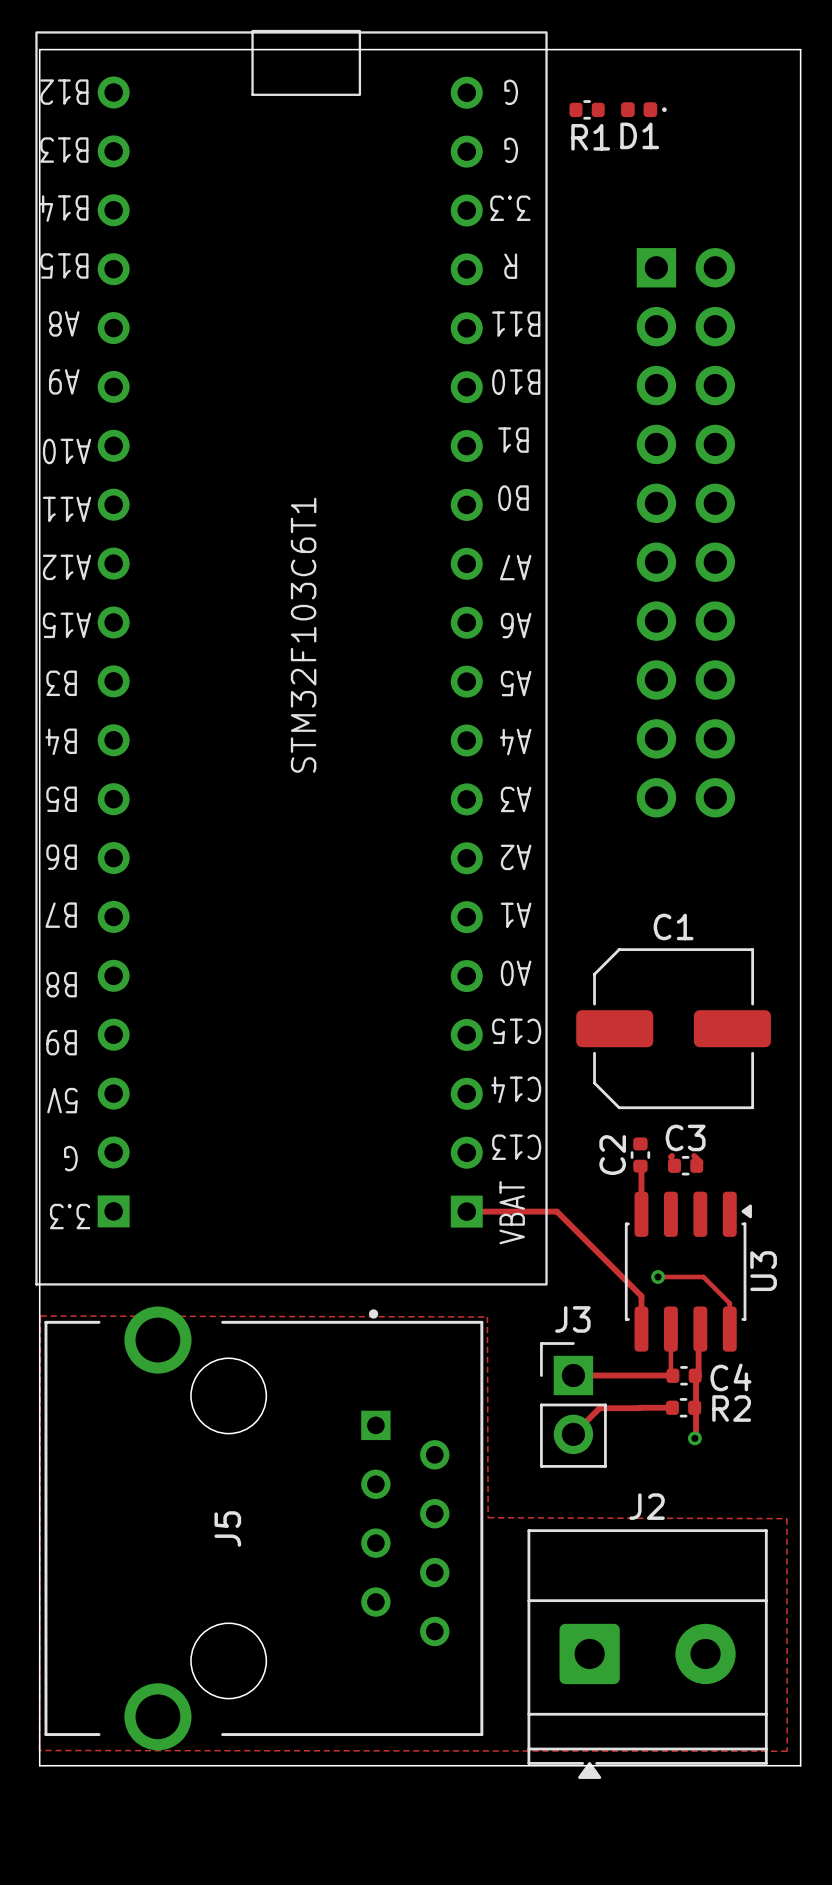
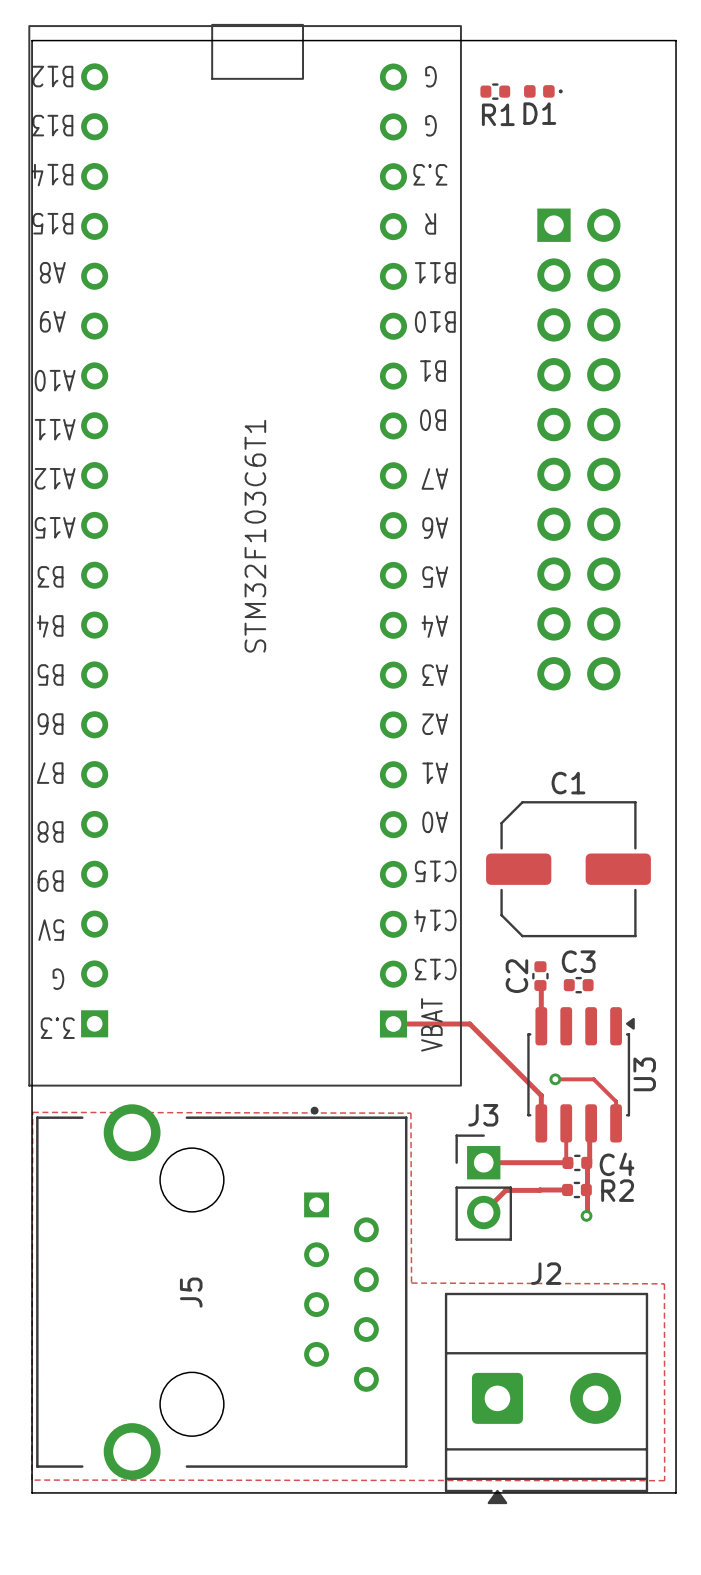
track: (671, 1155) (670, 1157) -> none
track: (694, 1155) (700, 1162) -> none

